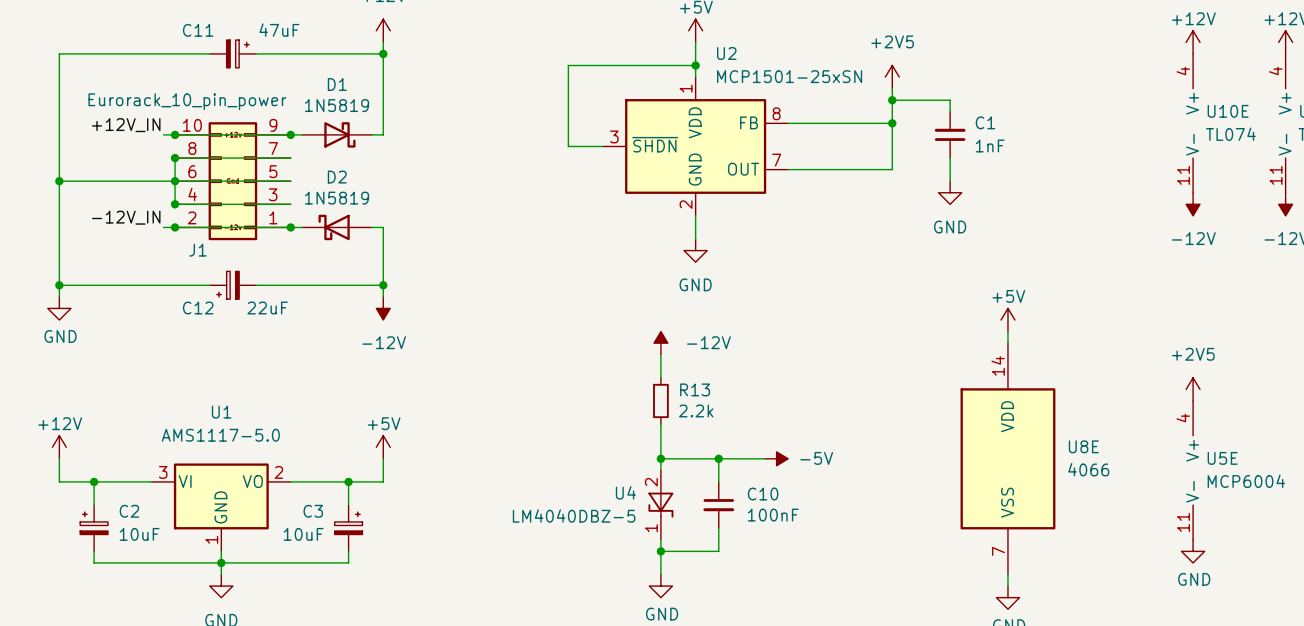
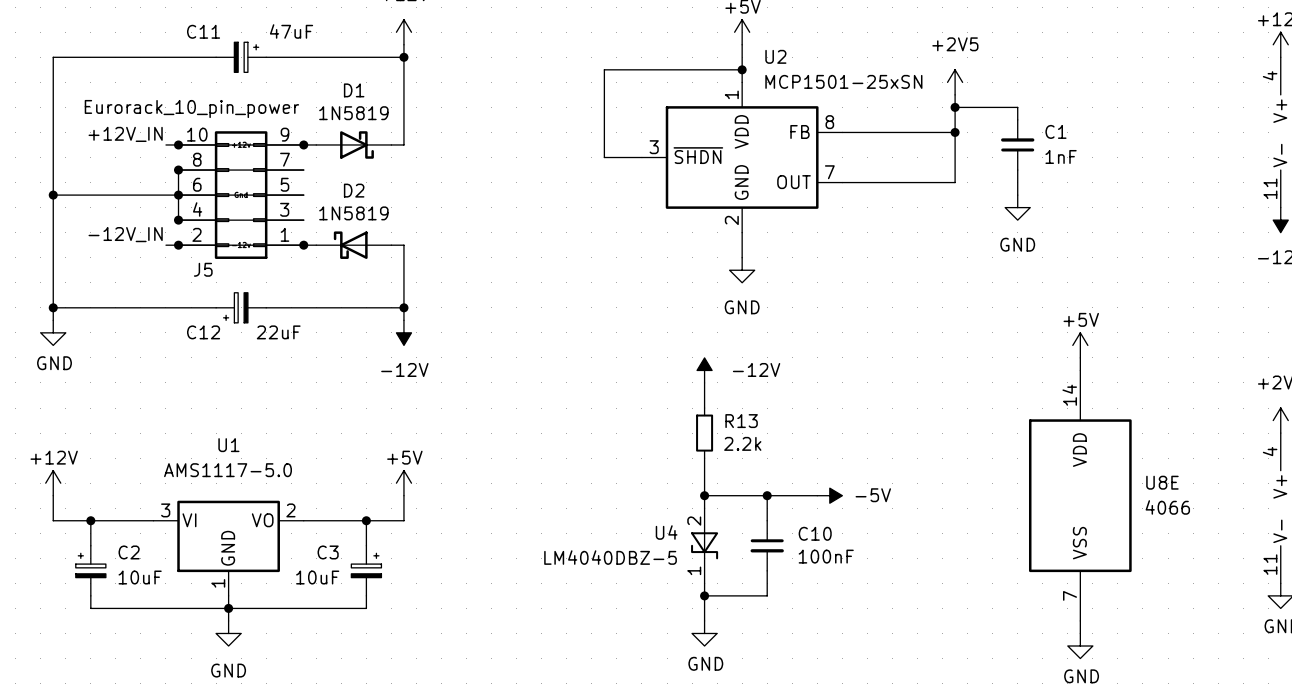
J1 name: J1 (197, 250) -> J5 (203, 269)

